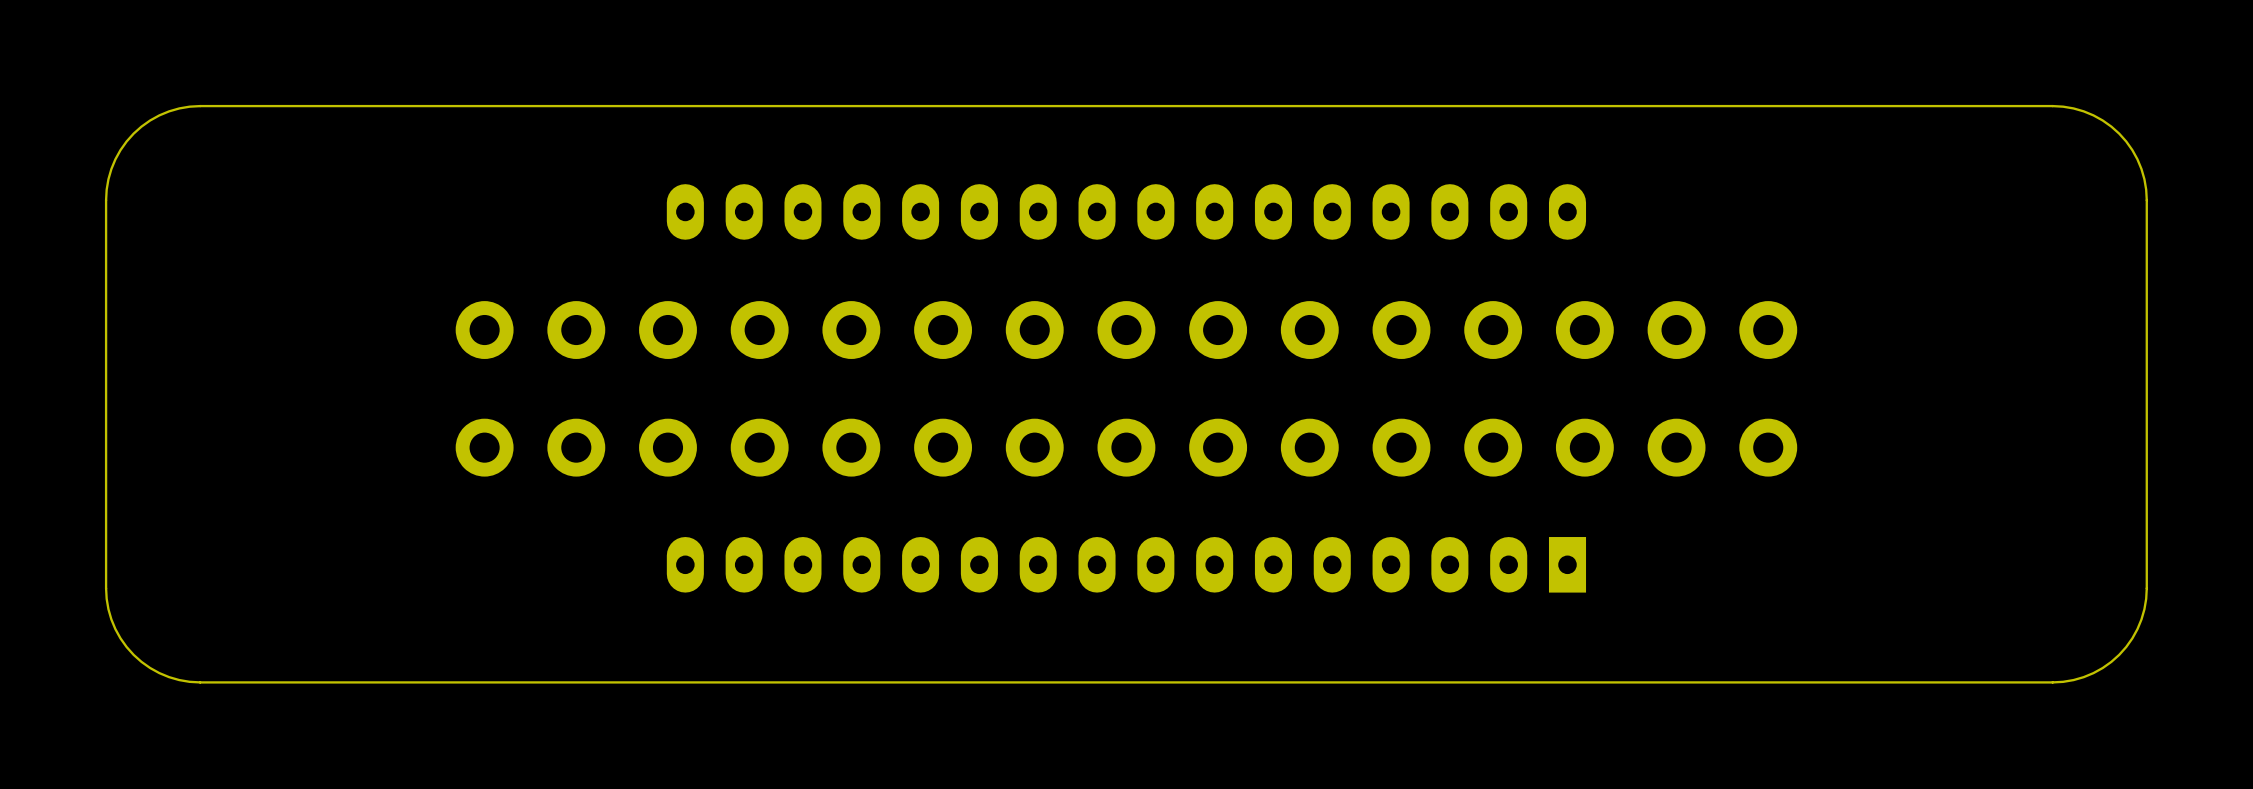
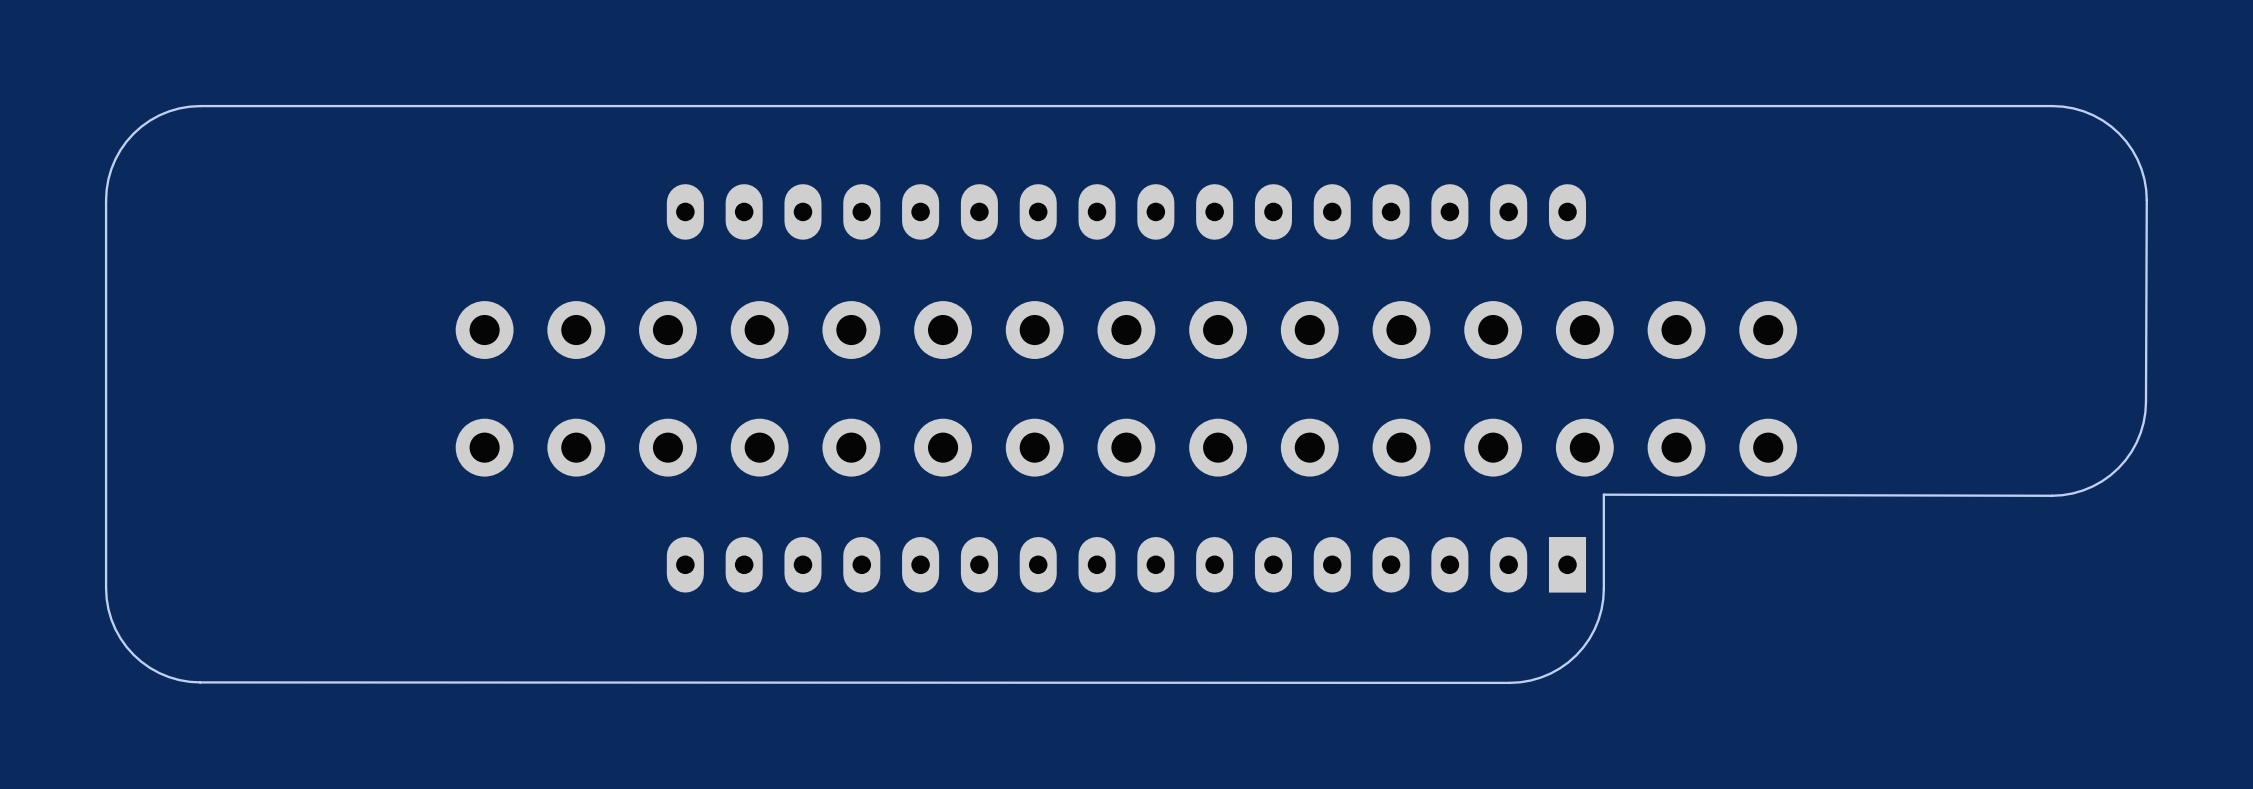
board edge: (2146, 200) (2146, 598) (2141, 619) (2126, 646) (2102, 668) (2073, 680) (2052, 682) (200, 682) -> (2146, 200) (2145, 412) (2140, 432) (2131, 451) (2110, 475) (2082, 490) (2051, 495) (1603, 494) (1603, 588) (1598, 619) (1589, 638) (1576, 655) (1559, 668) (1530, 680) (1509, 682) (200, 682)

